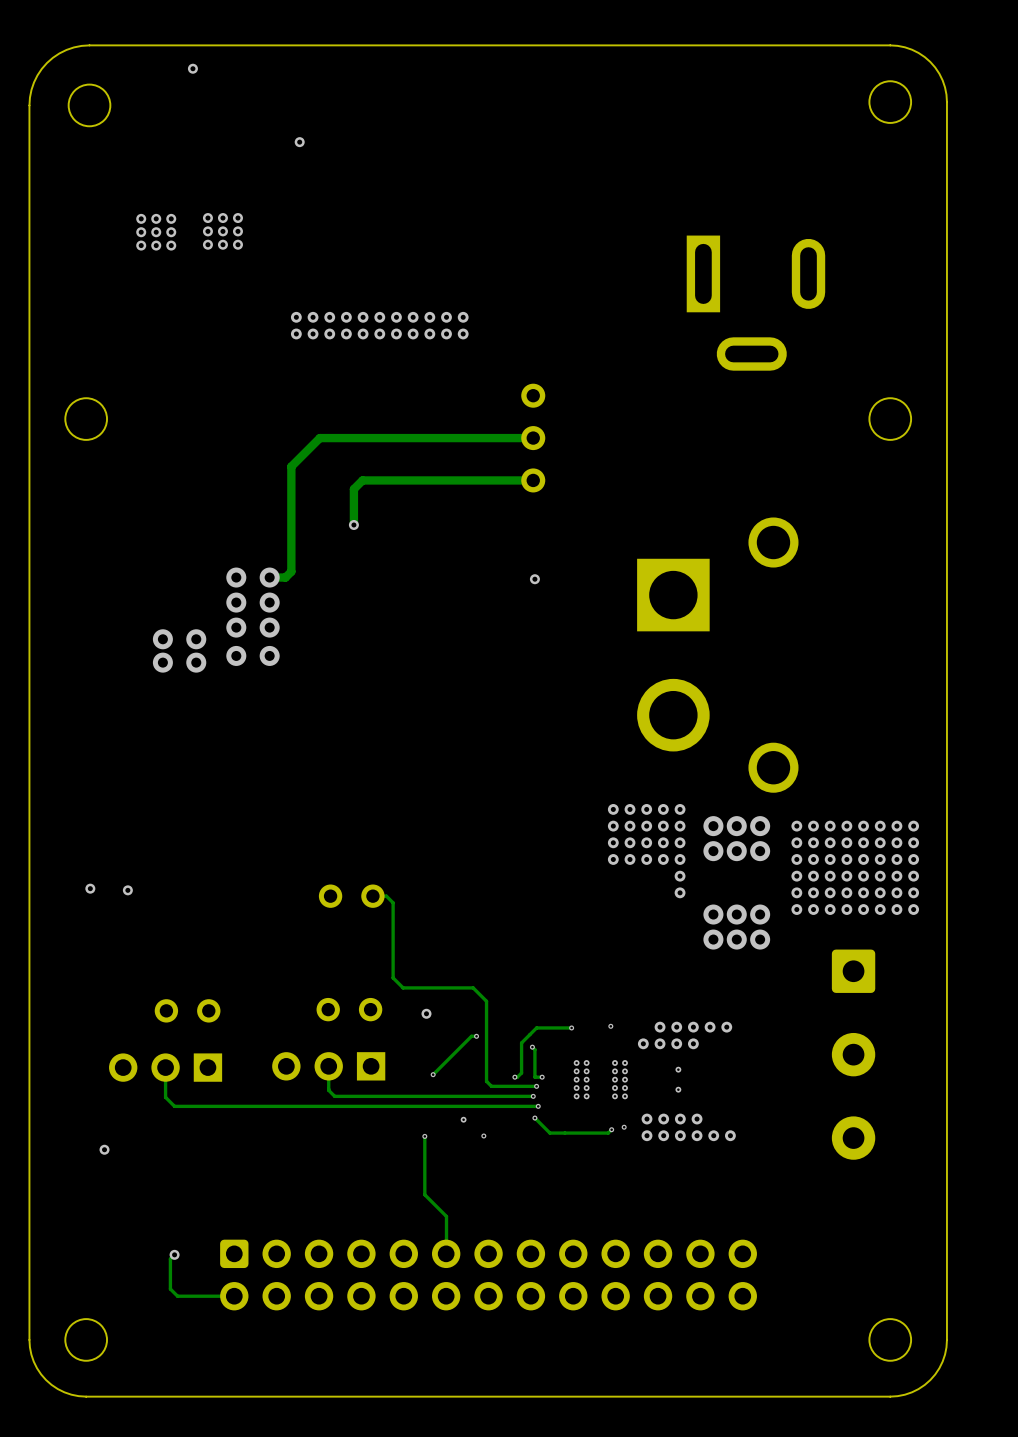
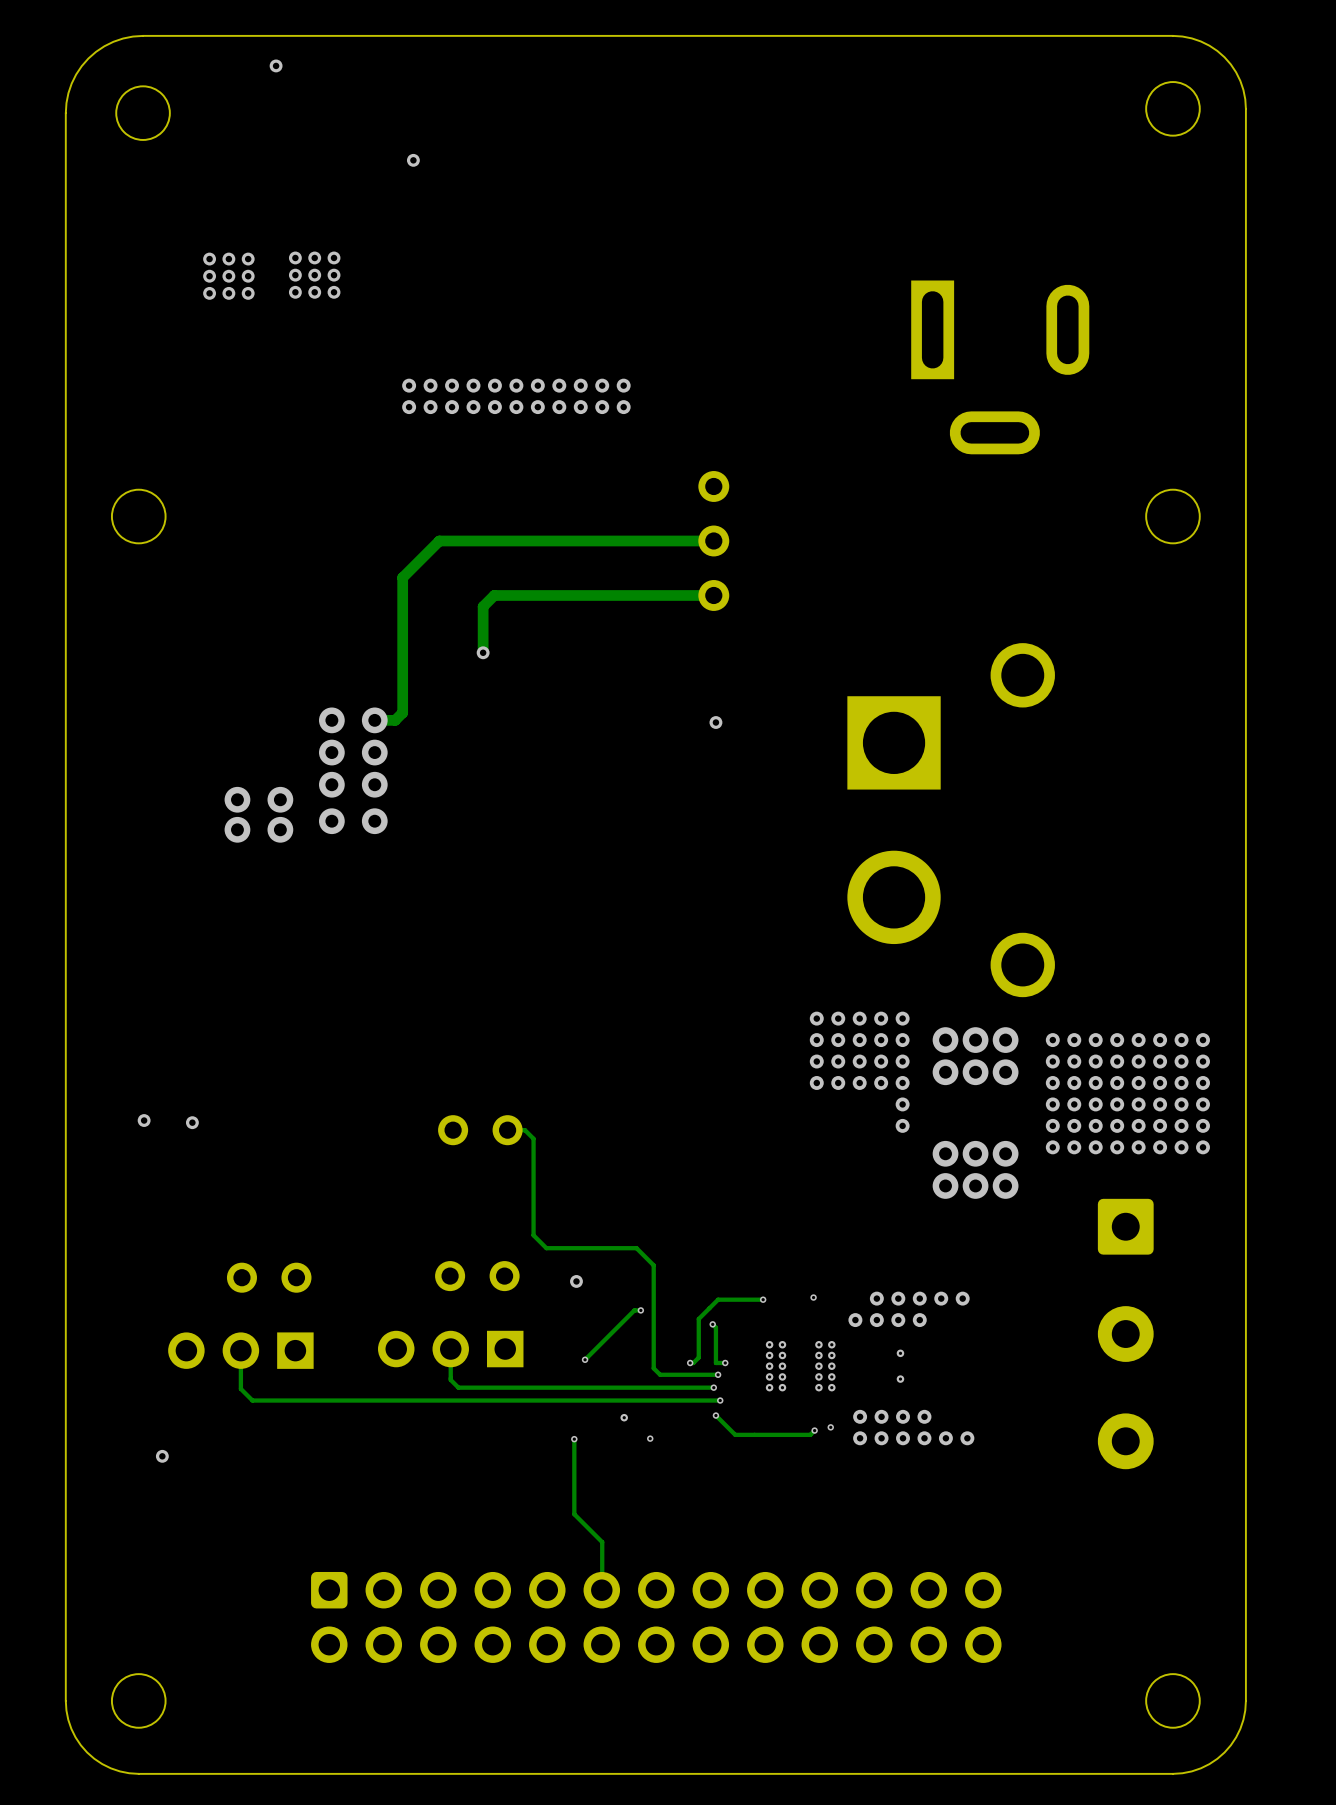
track: (174, 1254) (170, 1259) (170, 1289) (177, 1296) (234, 1296) -> none
via: (174, 1254) -> none

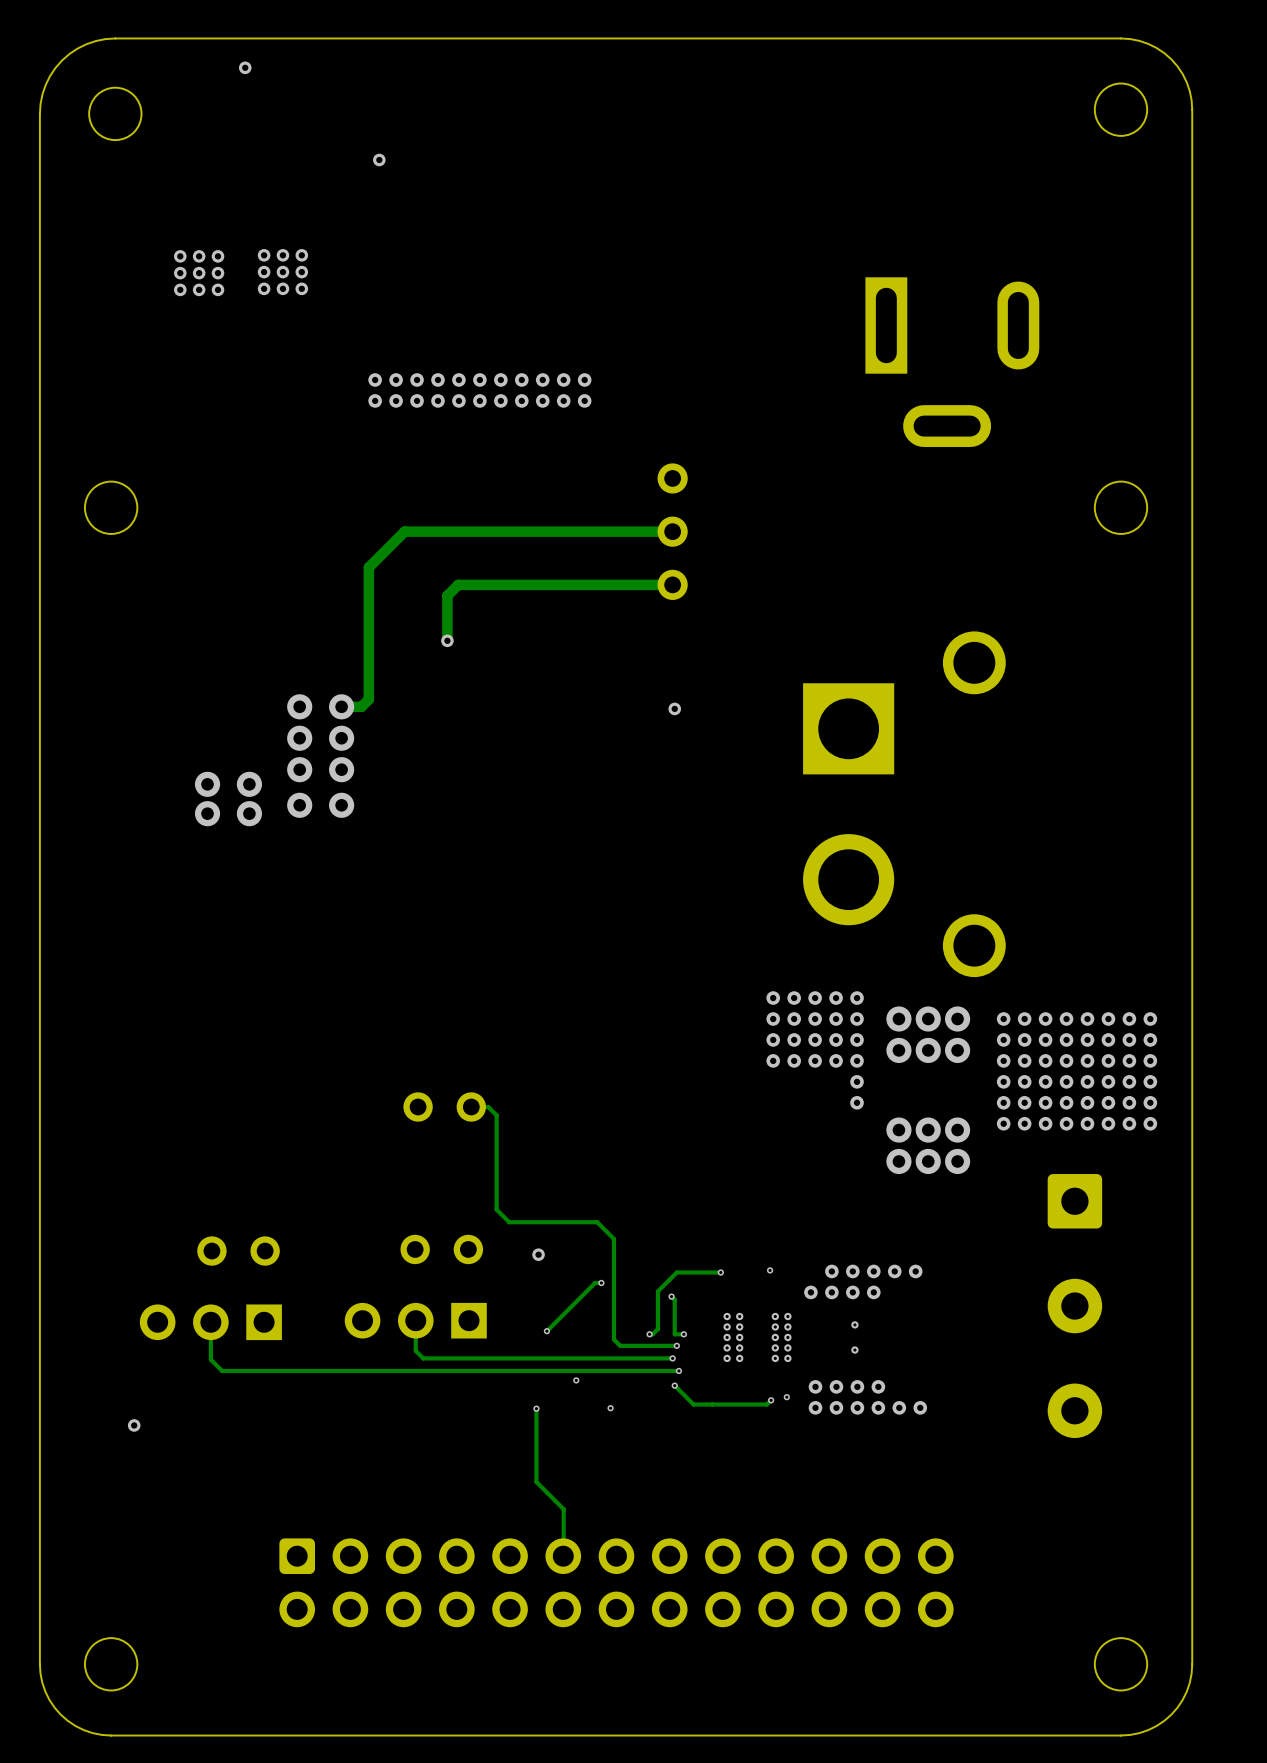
via: (144, 1120) -> none
via: (192, 1122) -> none
via: none -> (576, 1380)
via: (624, 1417) -> none

